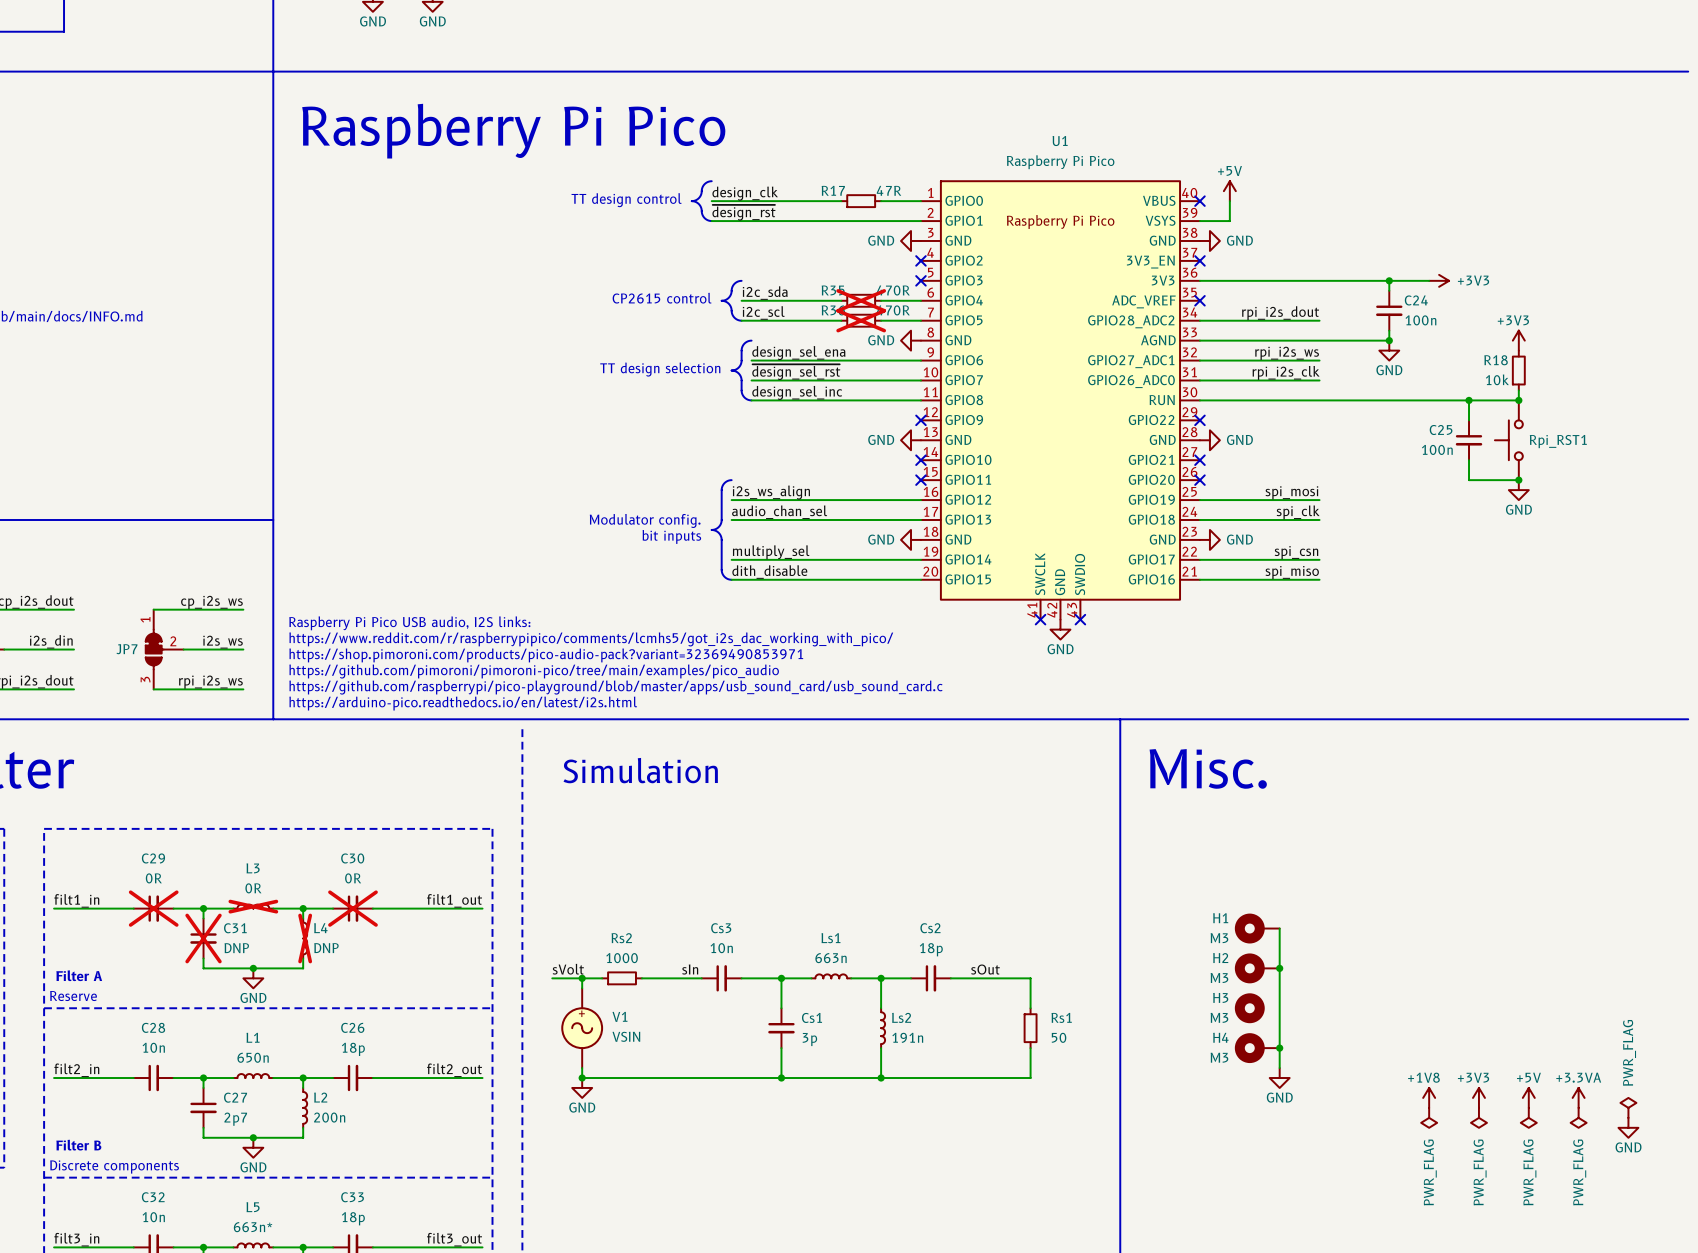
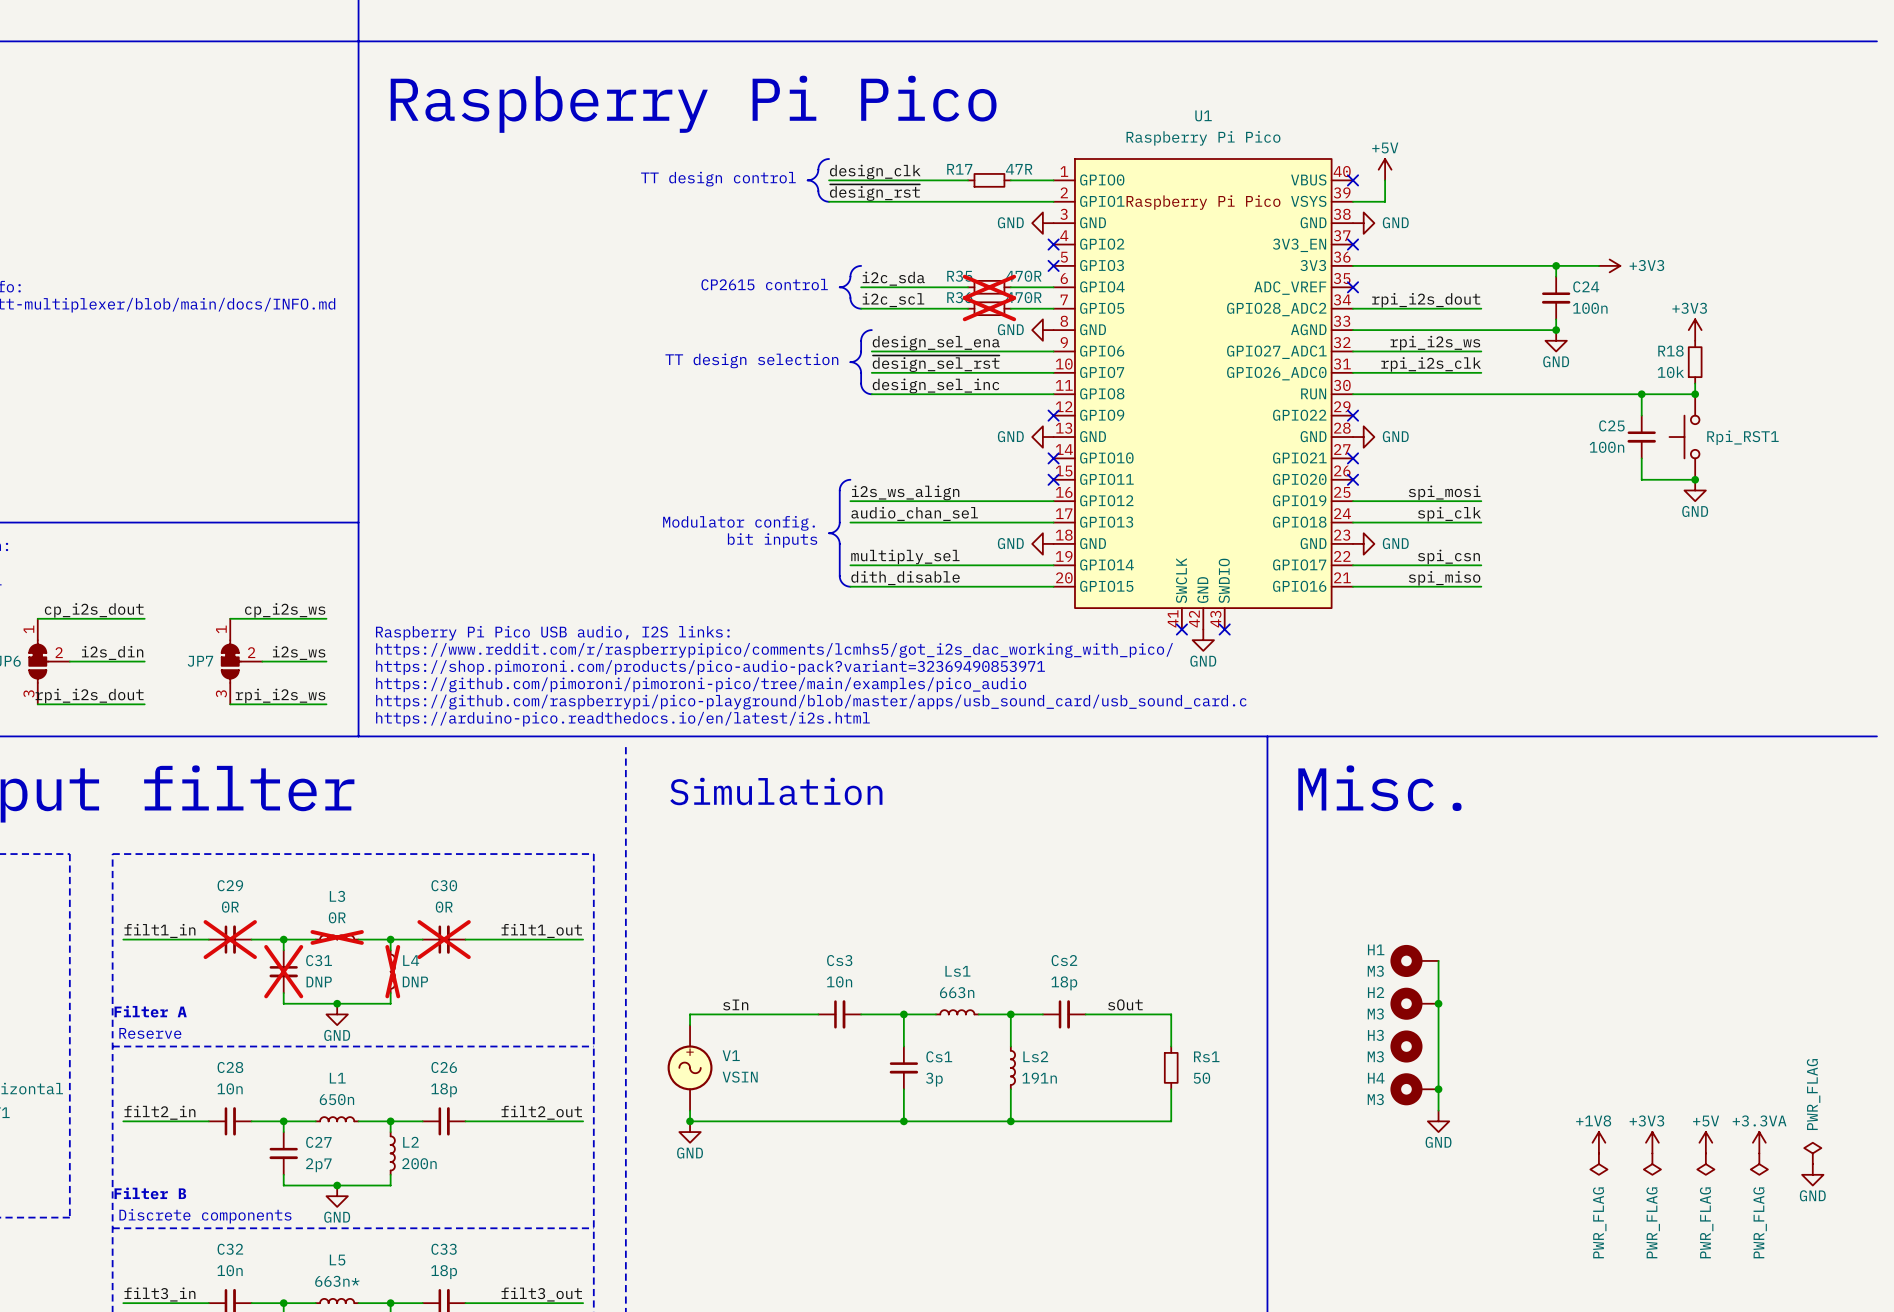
label: sVolt (568, 969) -> none
label position: sIn (690, 969) -> sIn (735, 1004)
wire: (552, 978) (582, 978) -> none
junction: (582, 978) -> none
wire: none -> (711, 1014) (754, 1014)
Rs2: 1000 (622, 978) -> none

